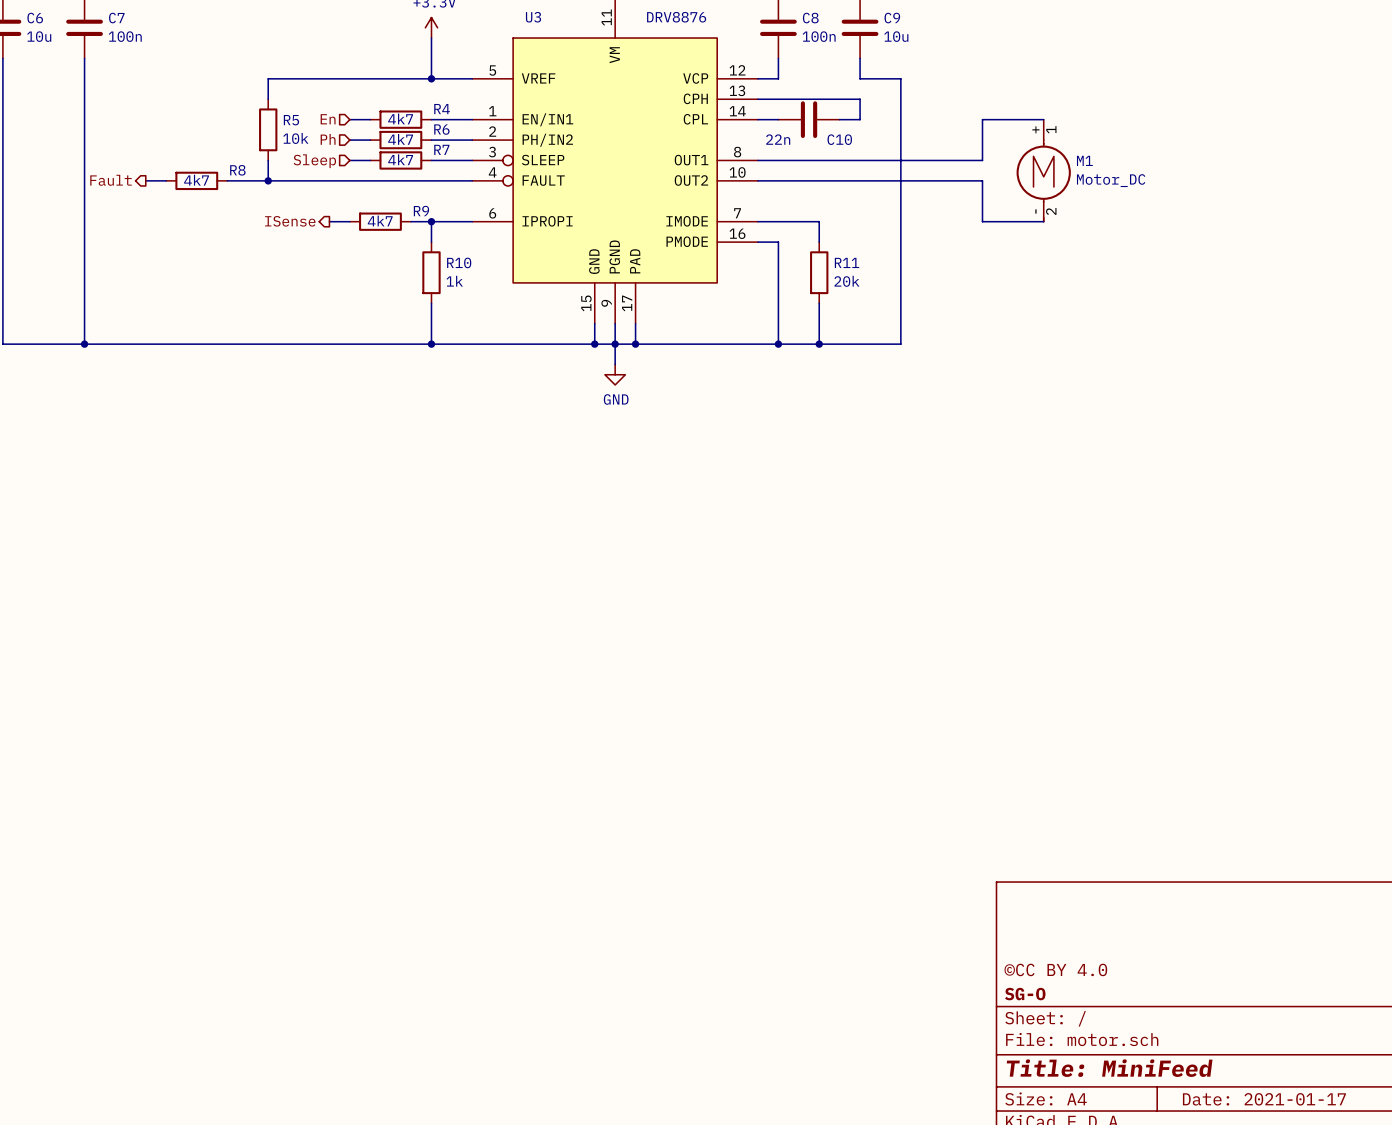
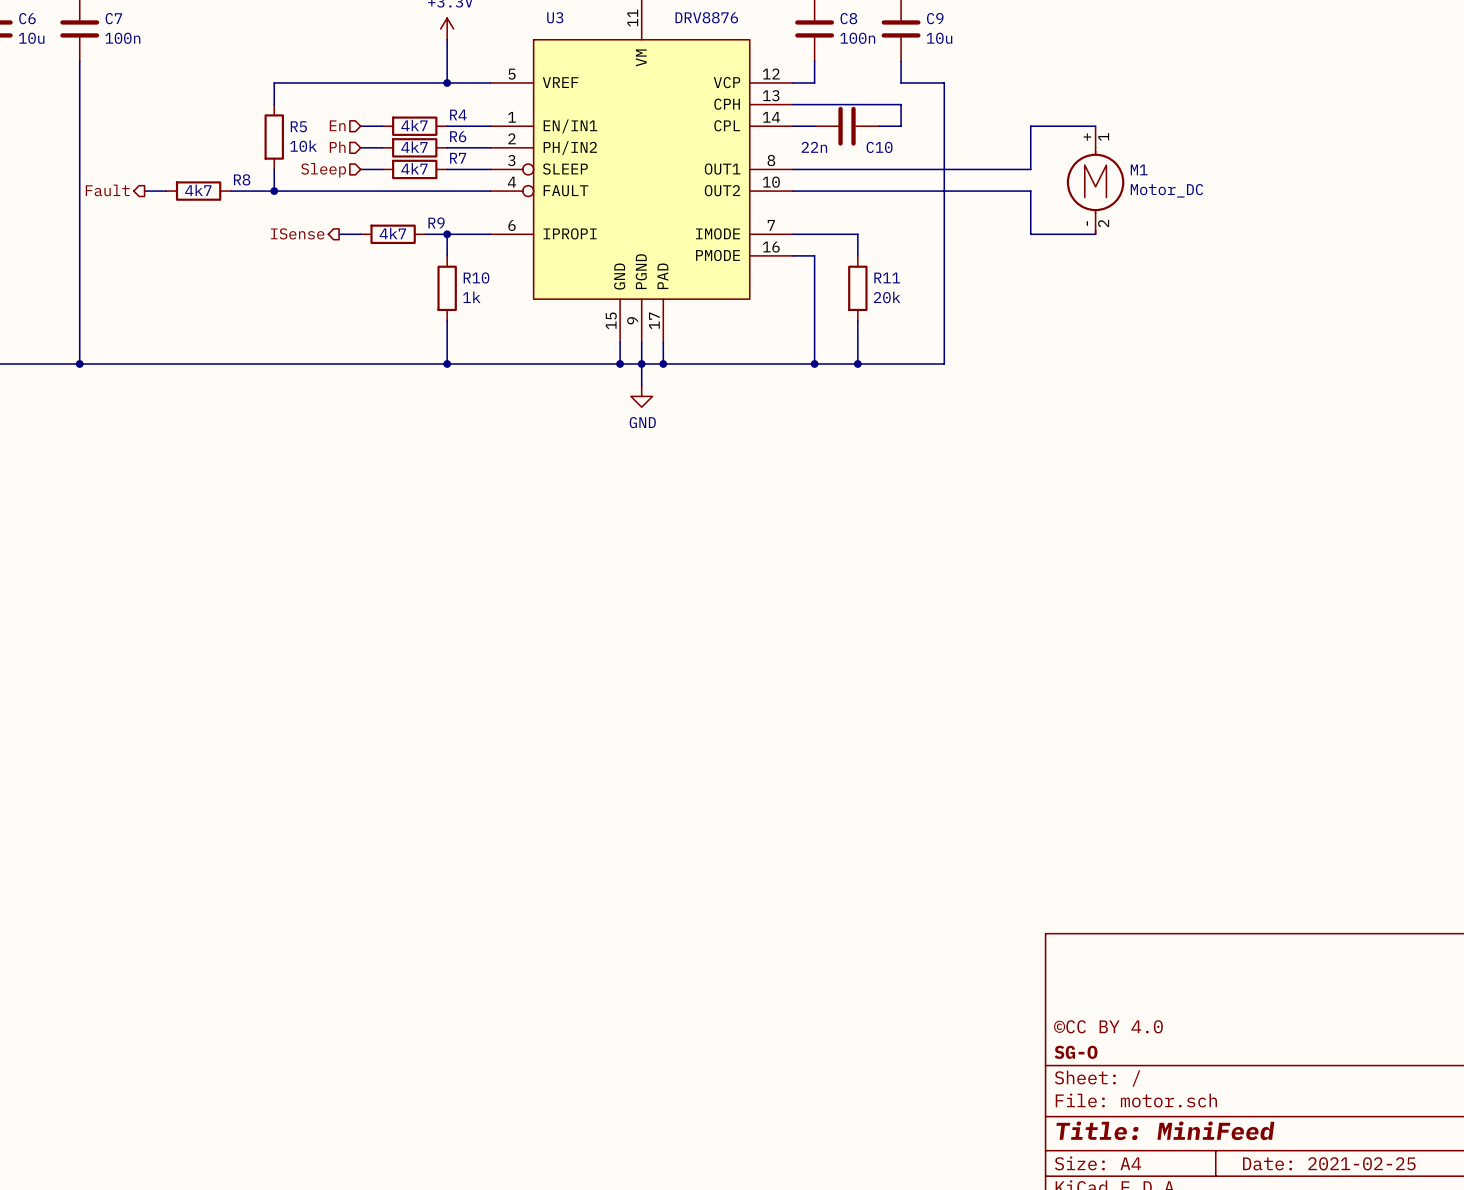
title block: Date: 2021-01-17 (1264, 1099) -> Date: 2021-02-25 (1329, 1163)

